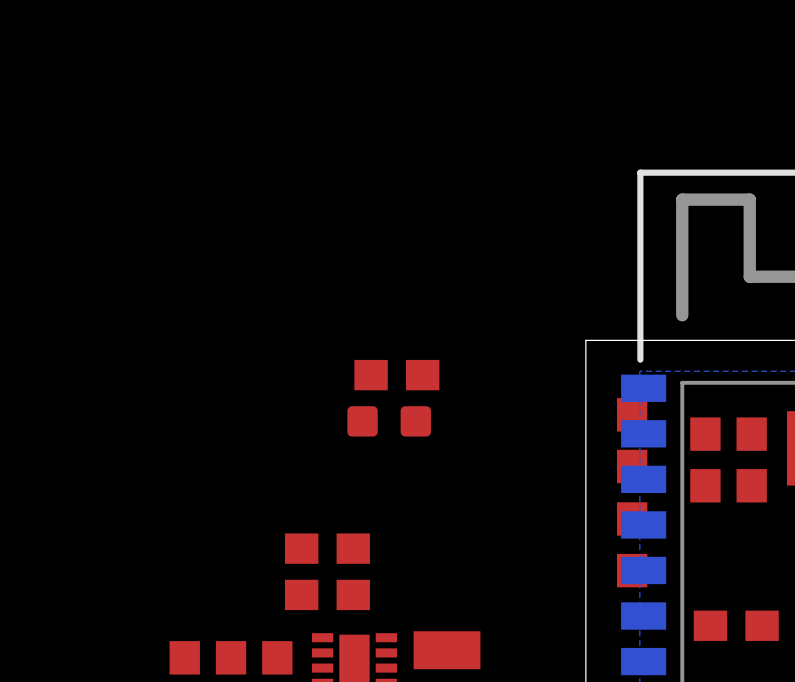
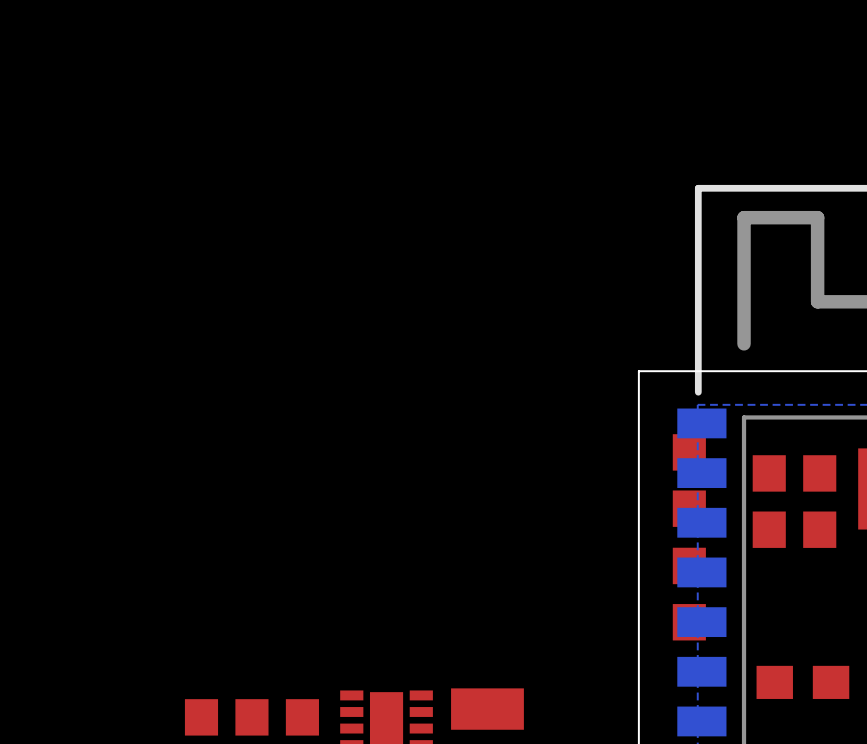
part: (396, 375) -> none
part: (389, 421) -> none
part: (327, 548) -> none
part: (327, 594) -> none

